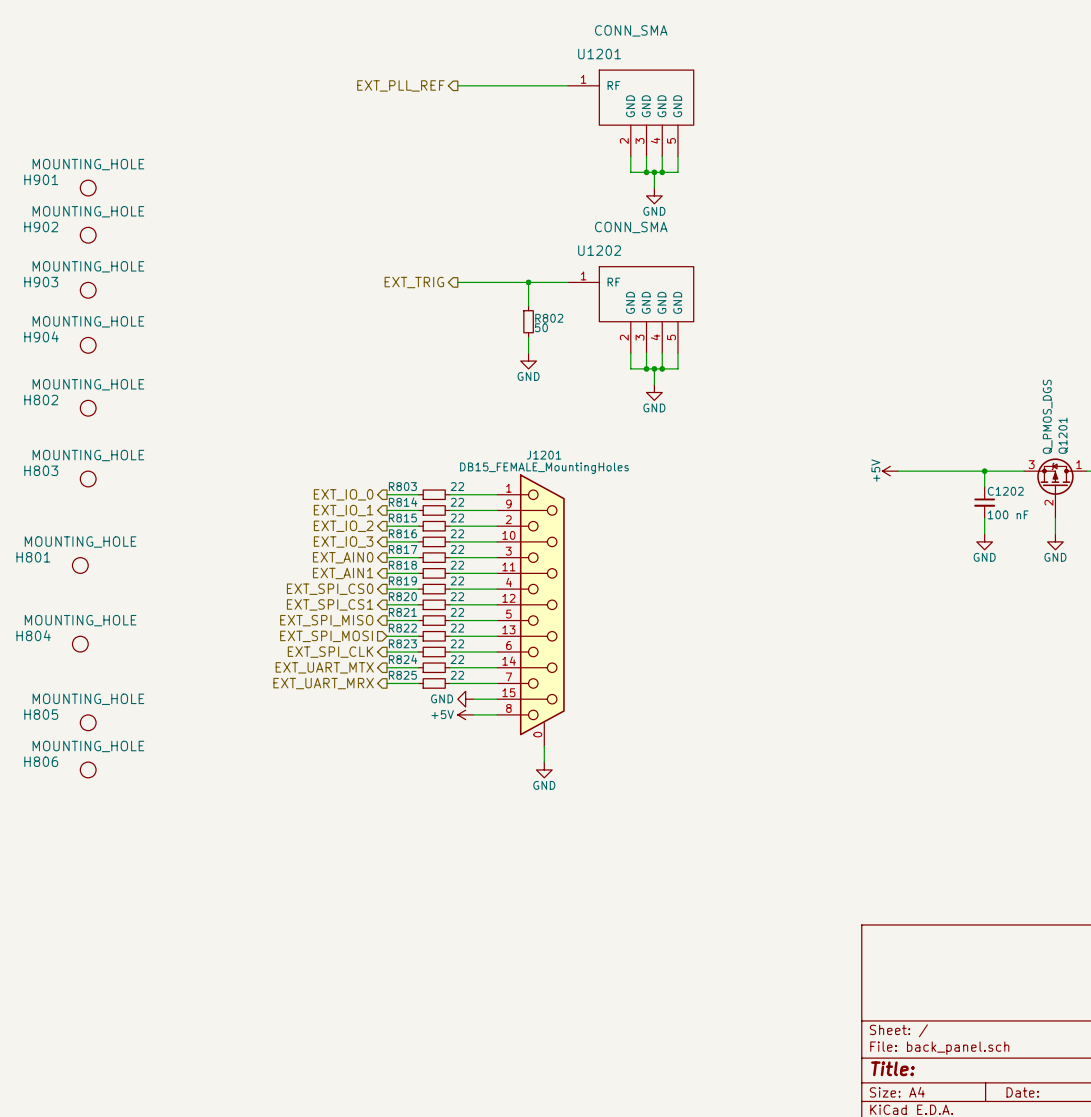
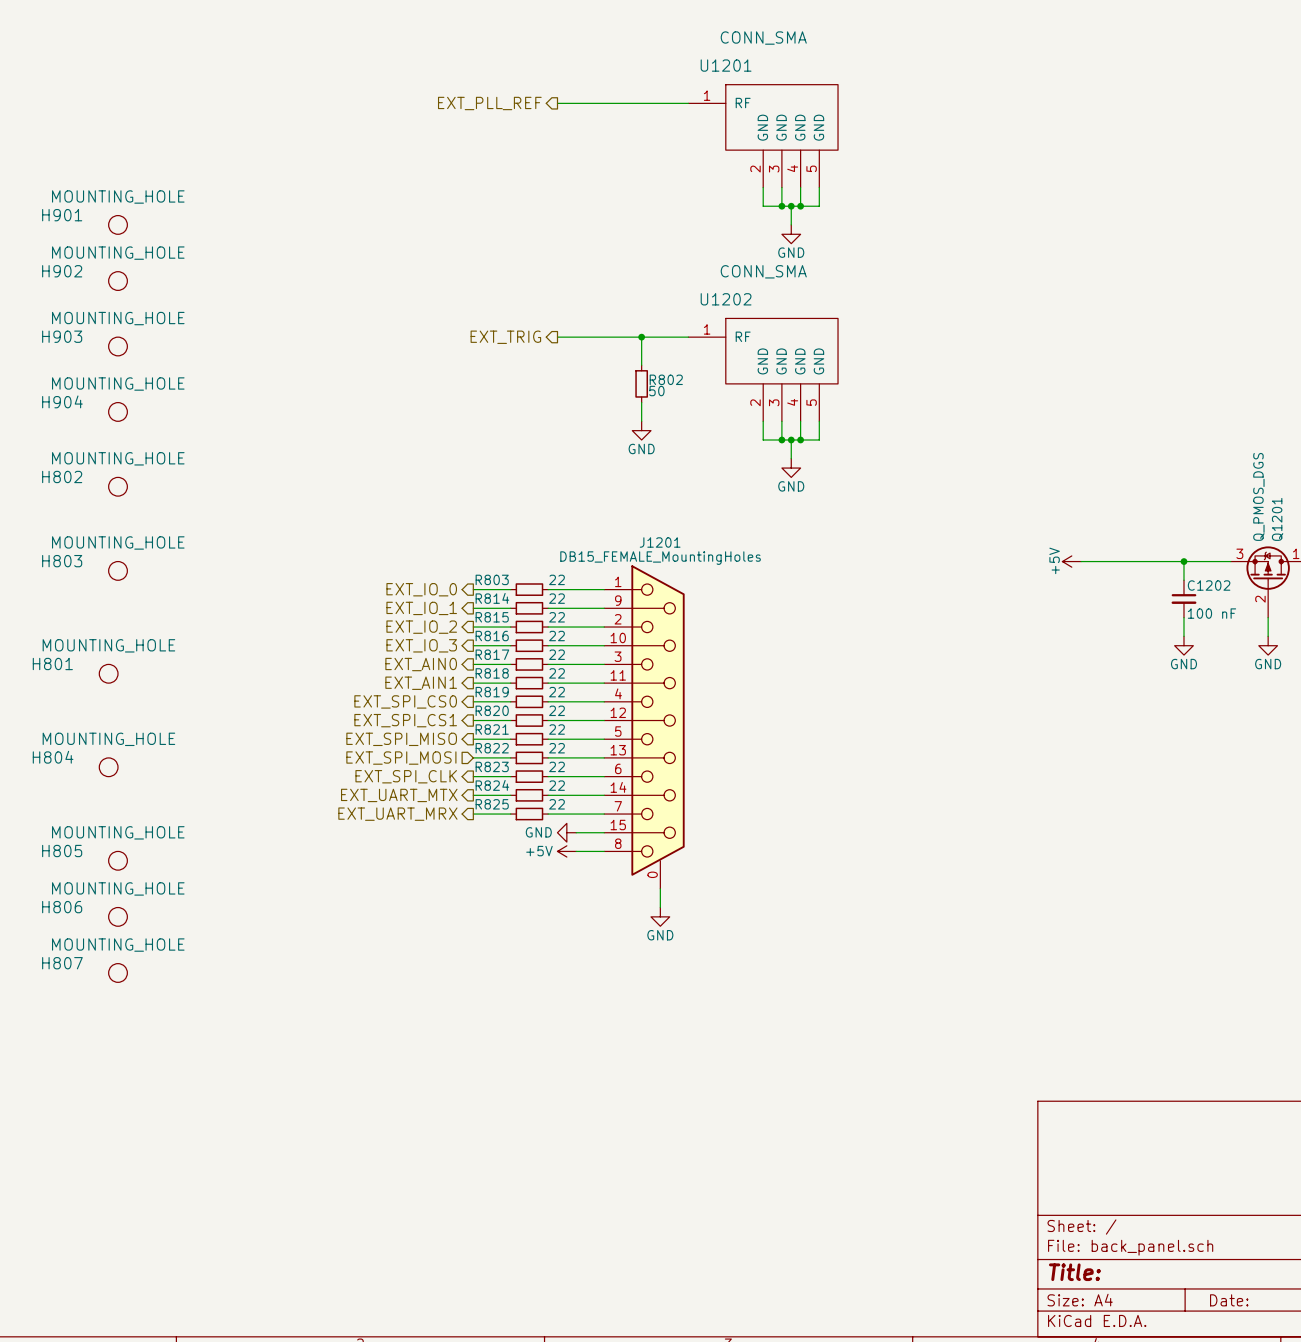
H807: none -> MOUNTING_HOLE (118, 972)

